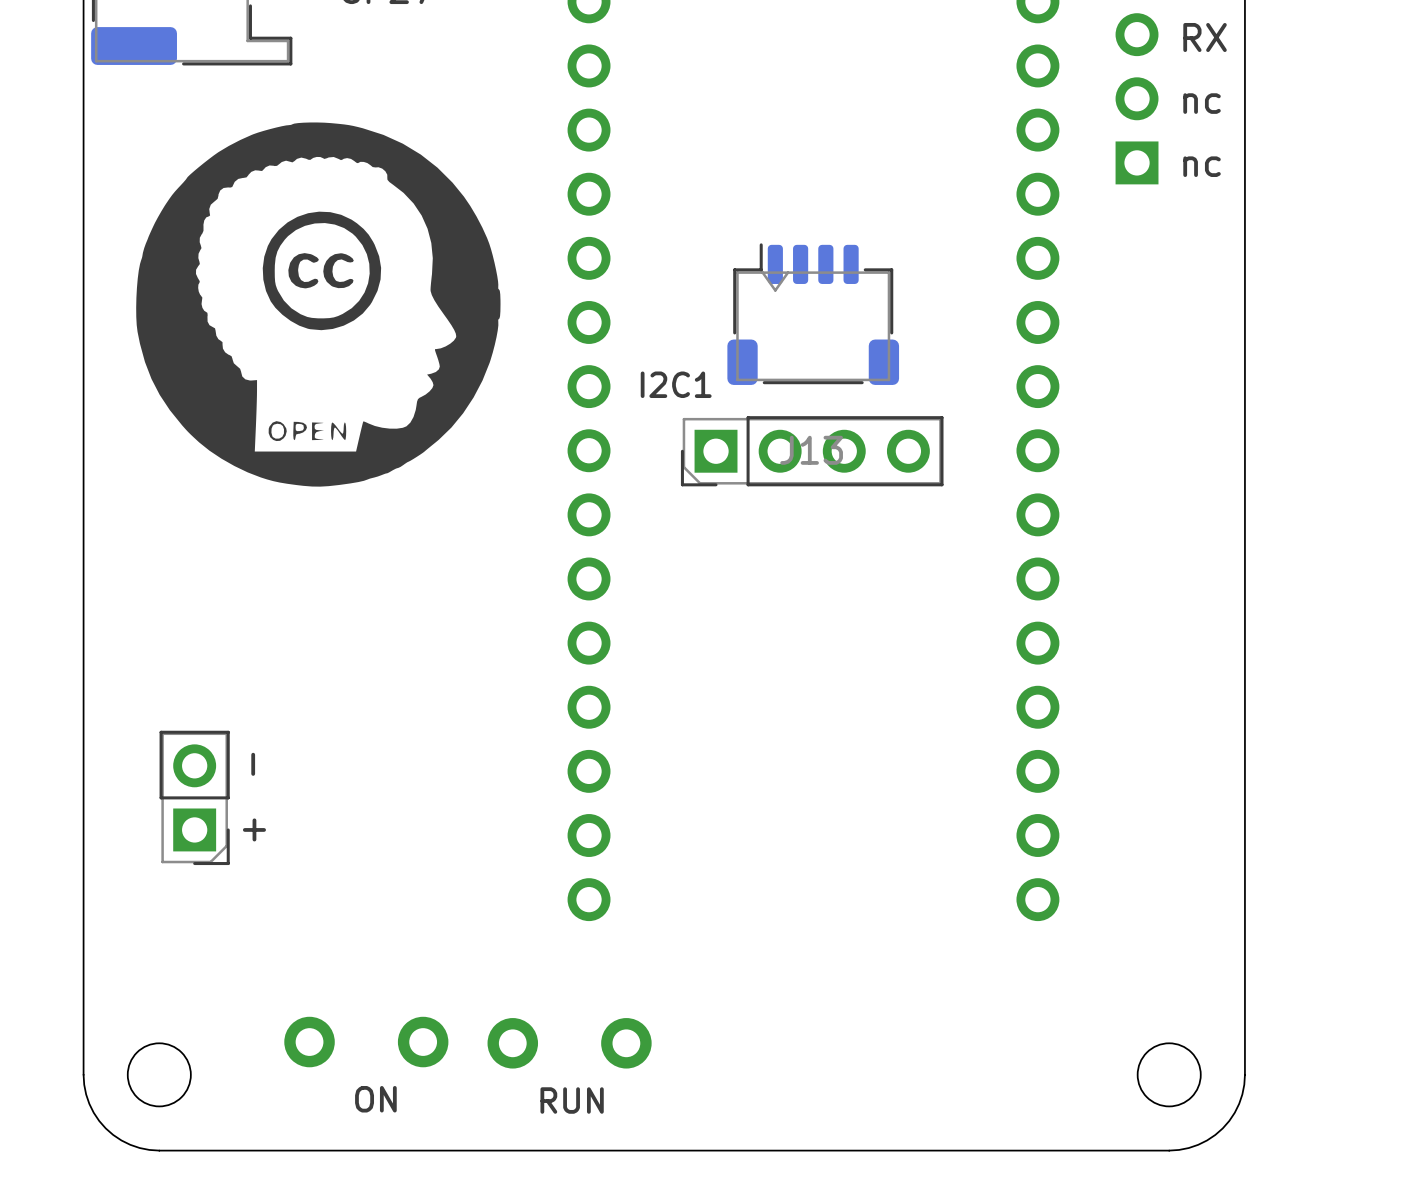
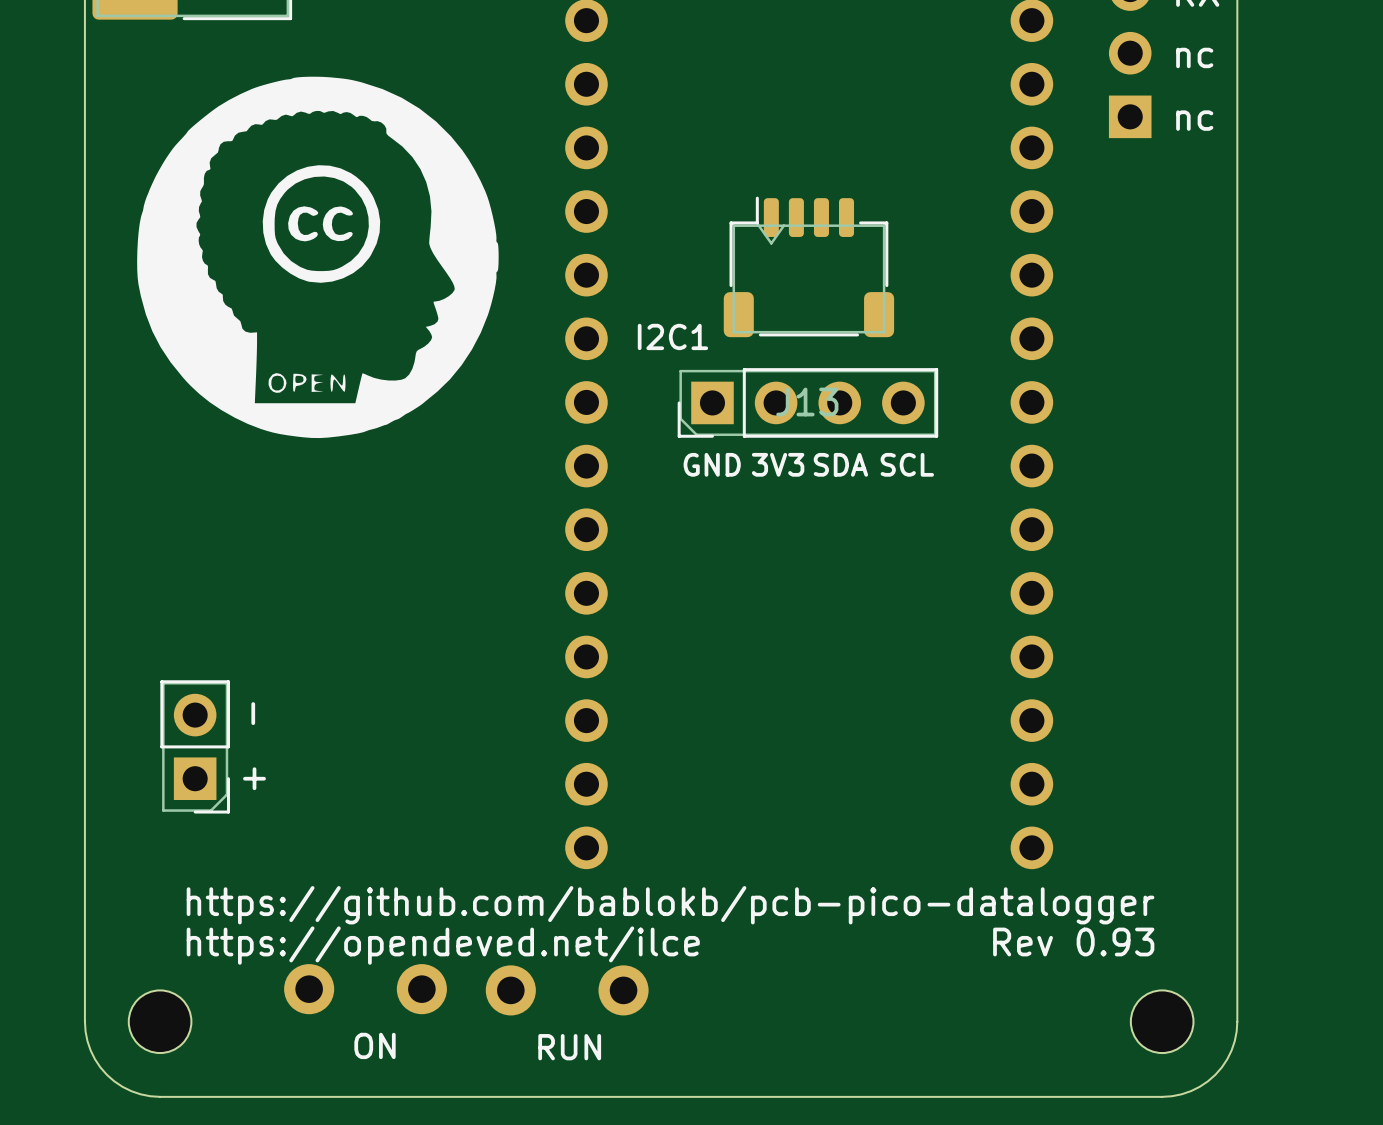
text: none -> GND (712, 464)
text: none -> 3V3 (778, 464)
text: none -> SDA (840, 464)
text: none -> SCL (907, 464)
text: none -> https://github.com/bablokb/pcb-pico-datalogger (670, 905)
text: none -> https://opendeved.net/ilce Rev 0.93 (670, 945)

